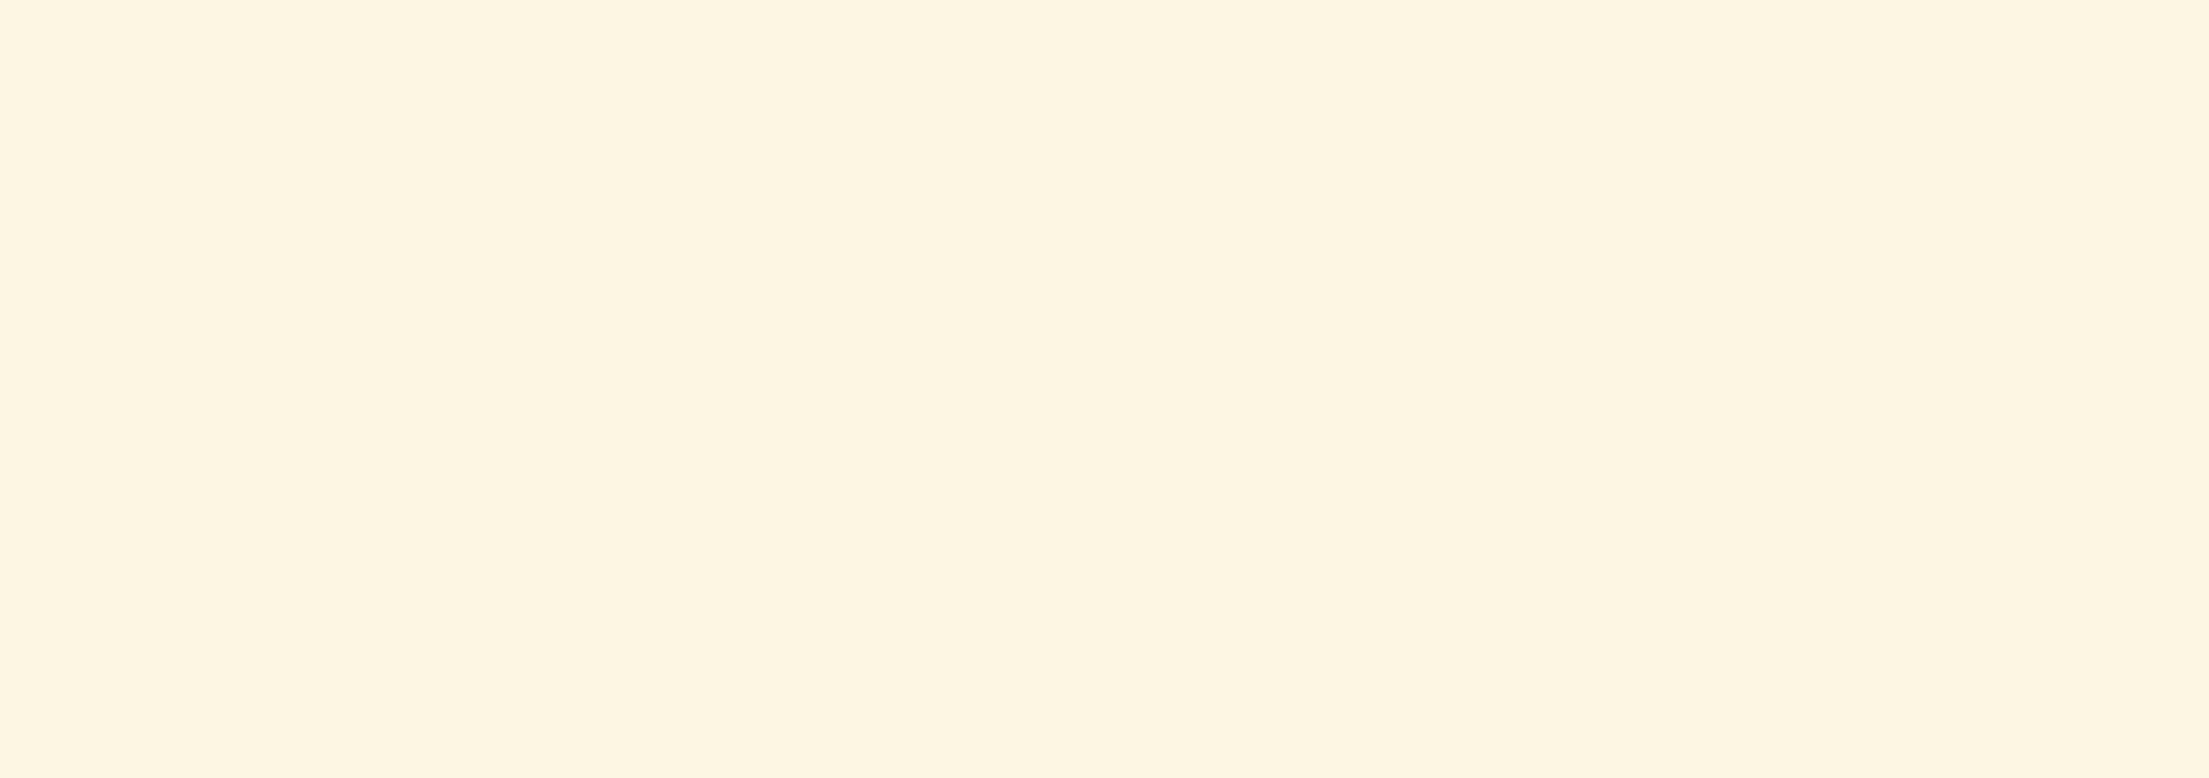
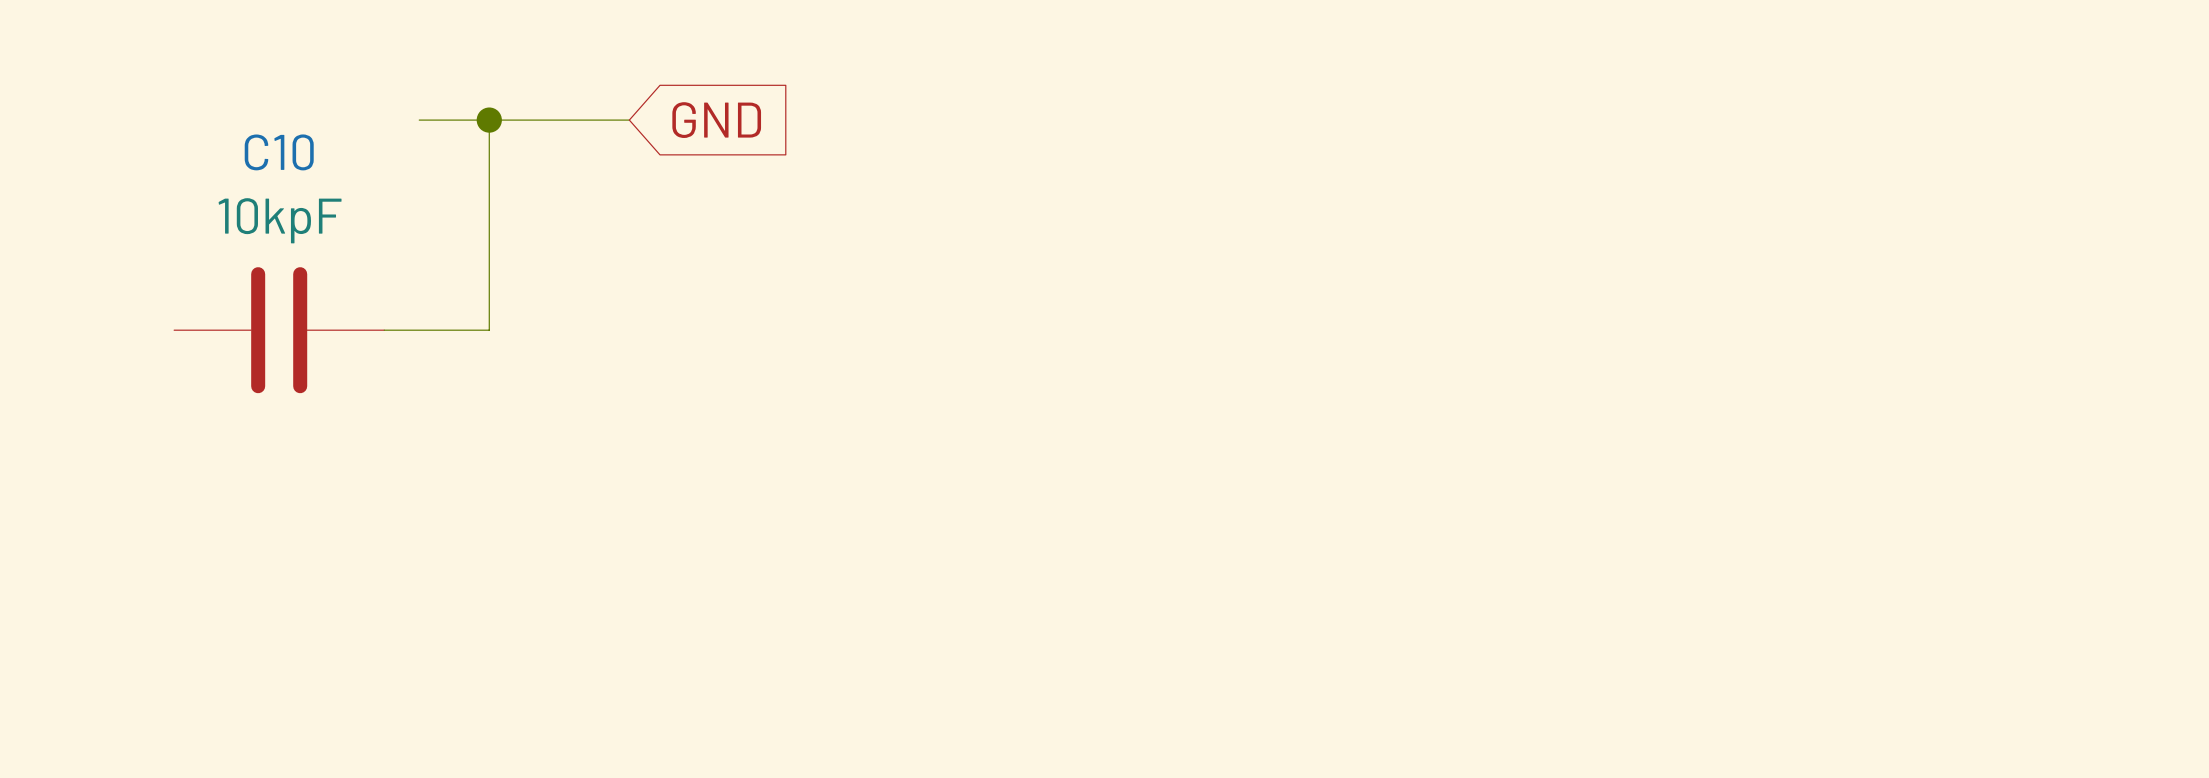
wire: none -> (419, 120) (629, 120)
wire: none -> (489, 120) (489, 330) (384, 330)
junction: none -> (489, 120)
global label: none -> GND (716, 120)
C10: none -> 10kpF (279, 330)

